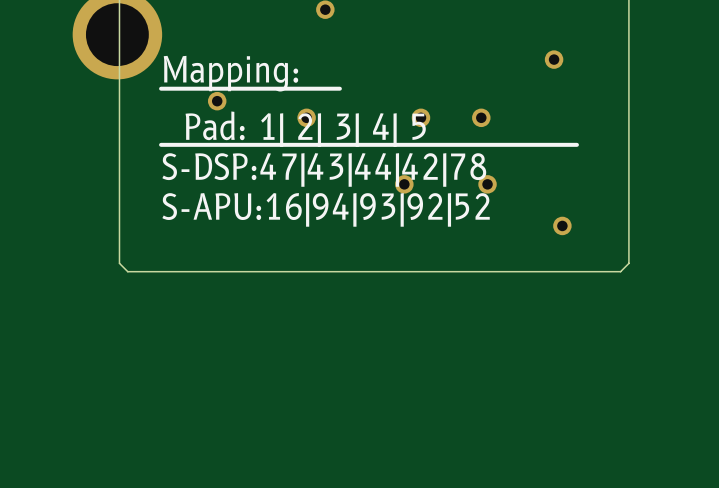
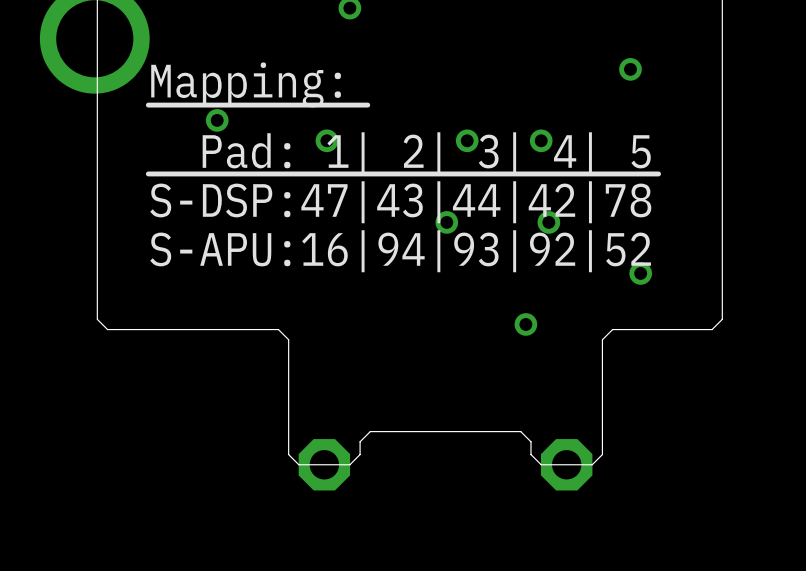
via: none -> (525, 324)
board edge: (539, 271) (267, 271) -> (612, 329) (602, 339) (602, 454) (592, 464) (541, 464) (530, 454) (530, 441) (520, 431) (370, 431) (360, 441) (360, 454) (349, 464) (298, 464) (288, 454) (288, 339) (278, 329)
part: none -> (324, 464)
part: none -> (566, 464)

